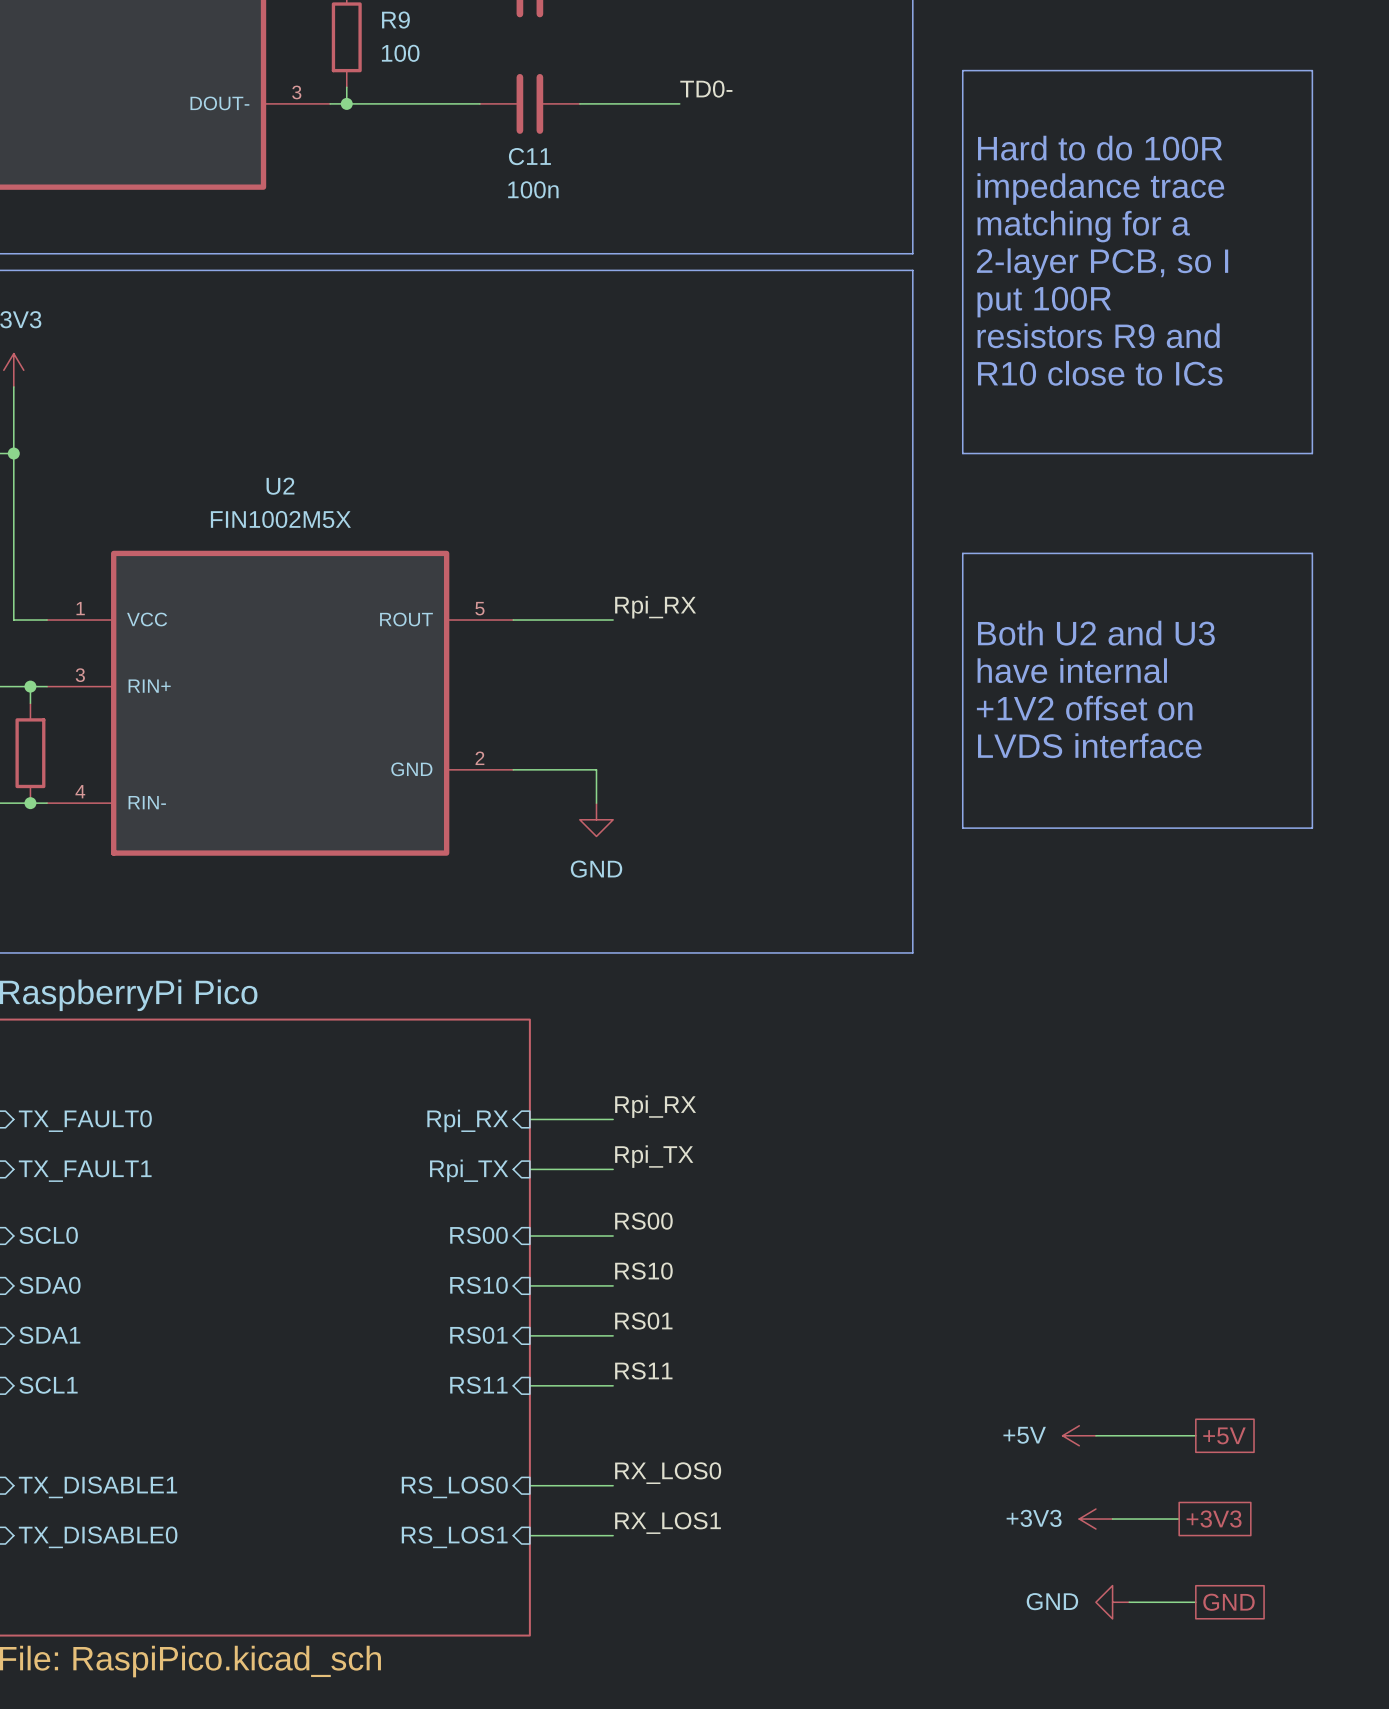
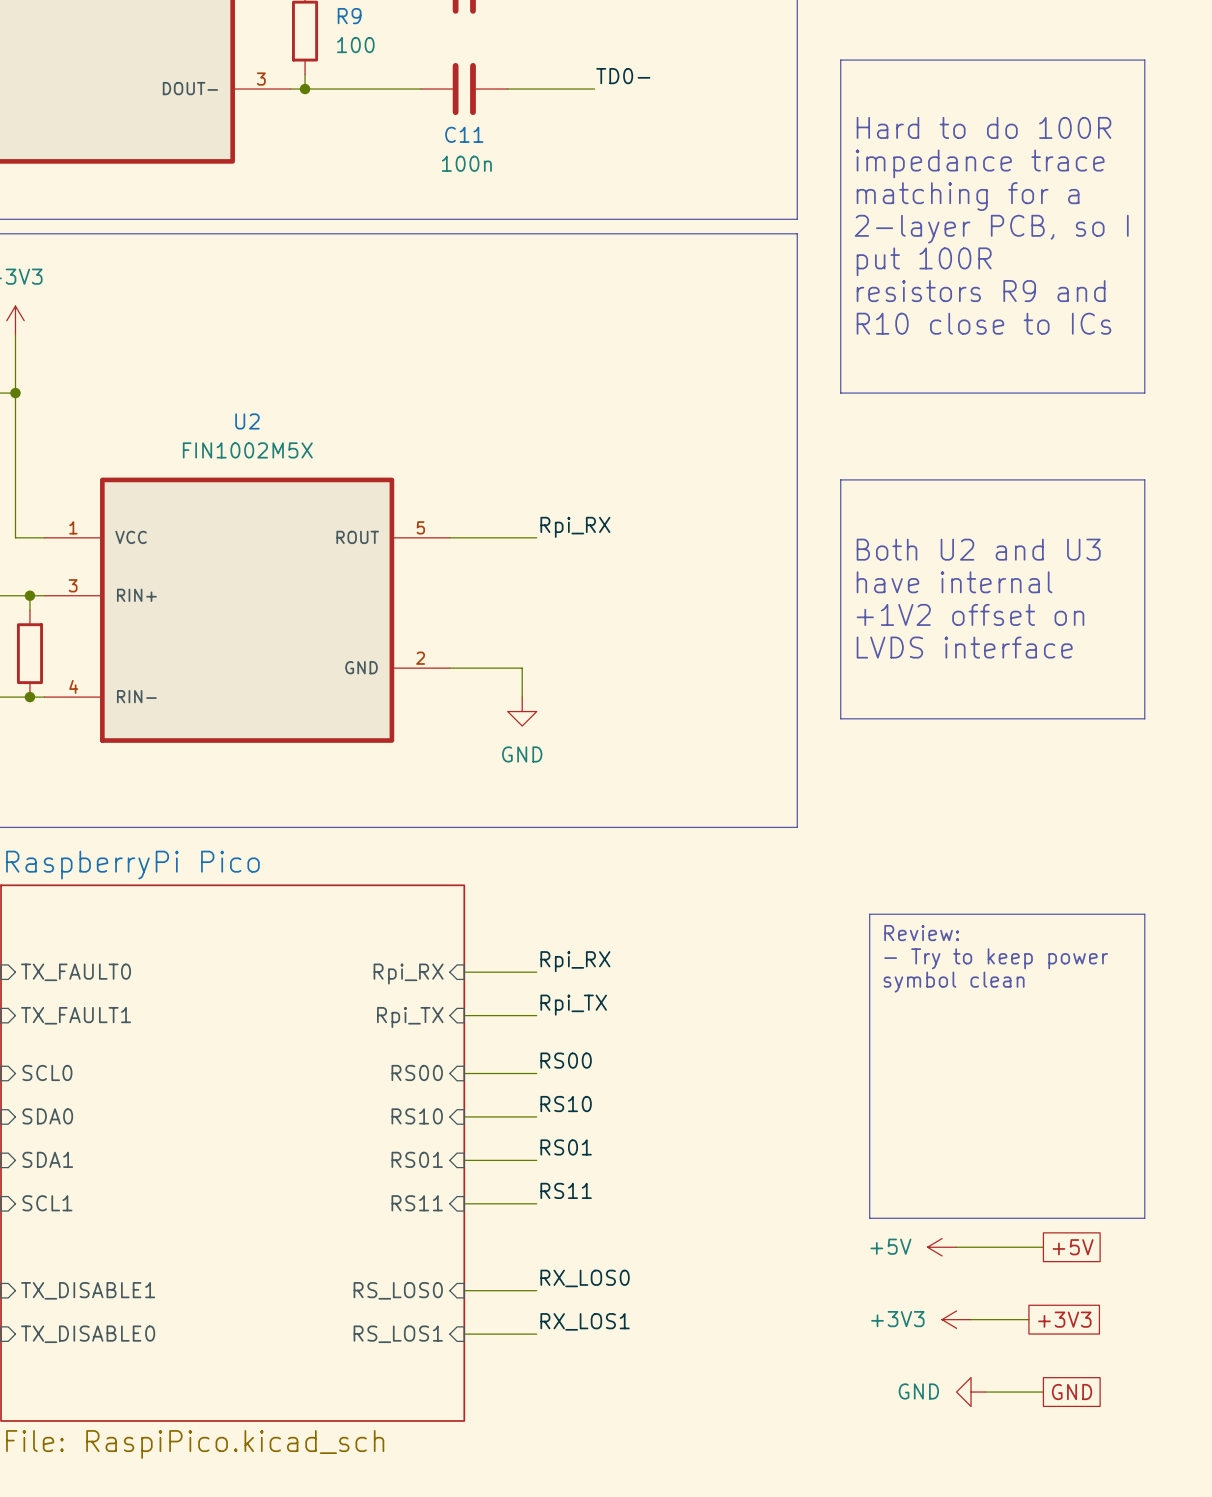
line: none -> (869, 914) (1144, 914) (1144, 1218) (869, 1218) (869, 914)
text: none -> Review: (921, 933)
text: none -> - Try to keep power (996, 958)
text: none -> symbol clean (954, 982)

